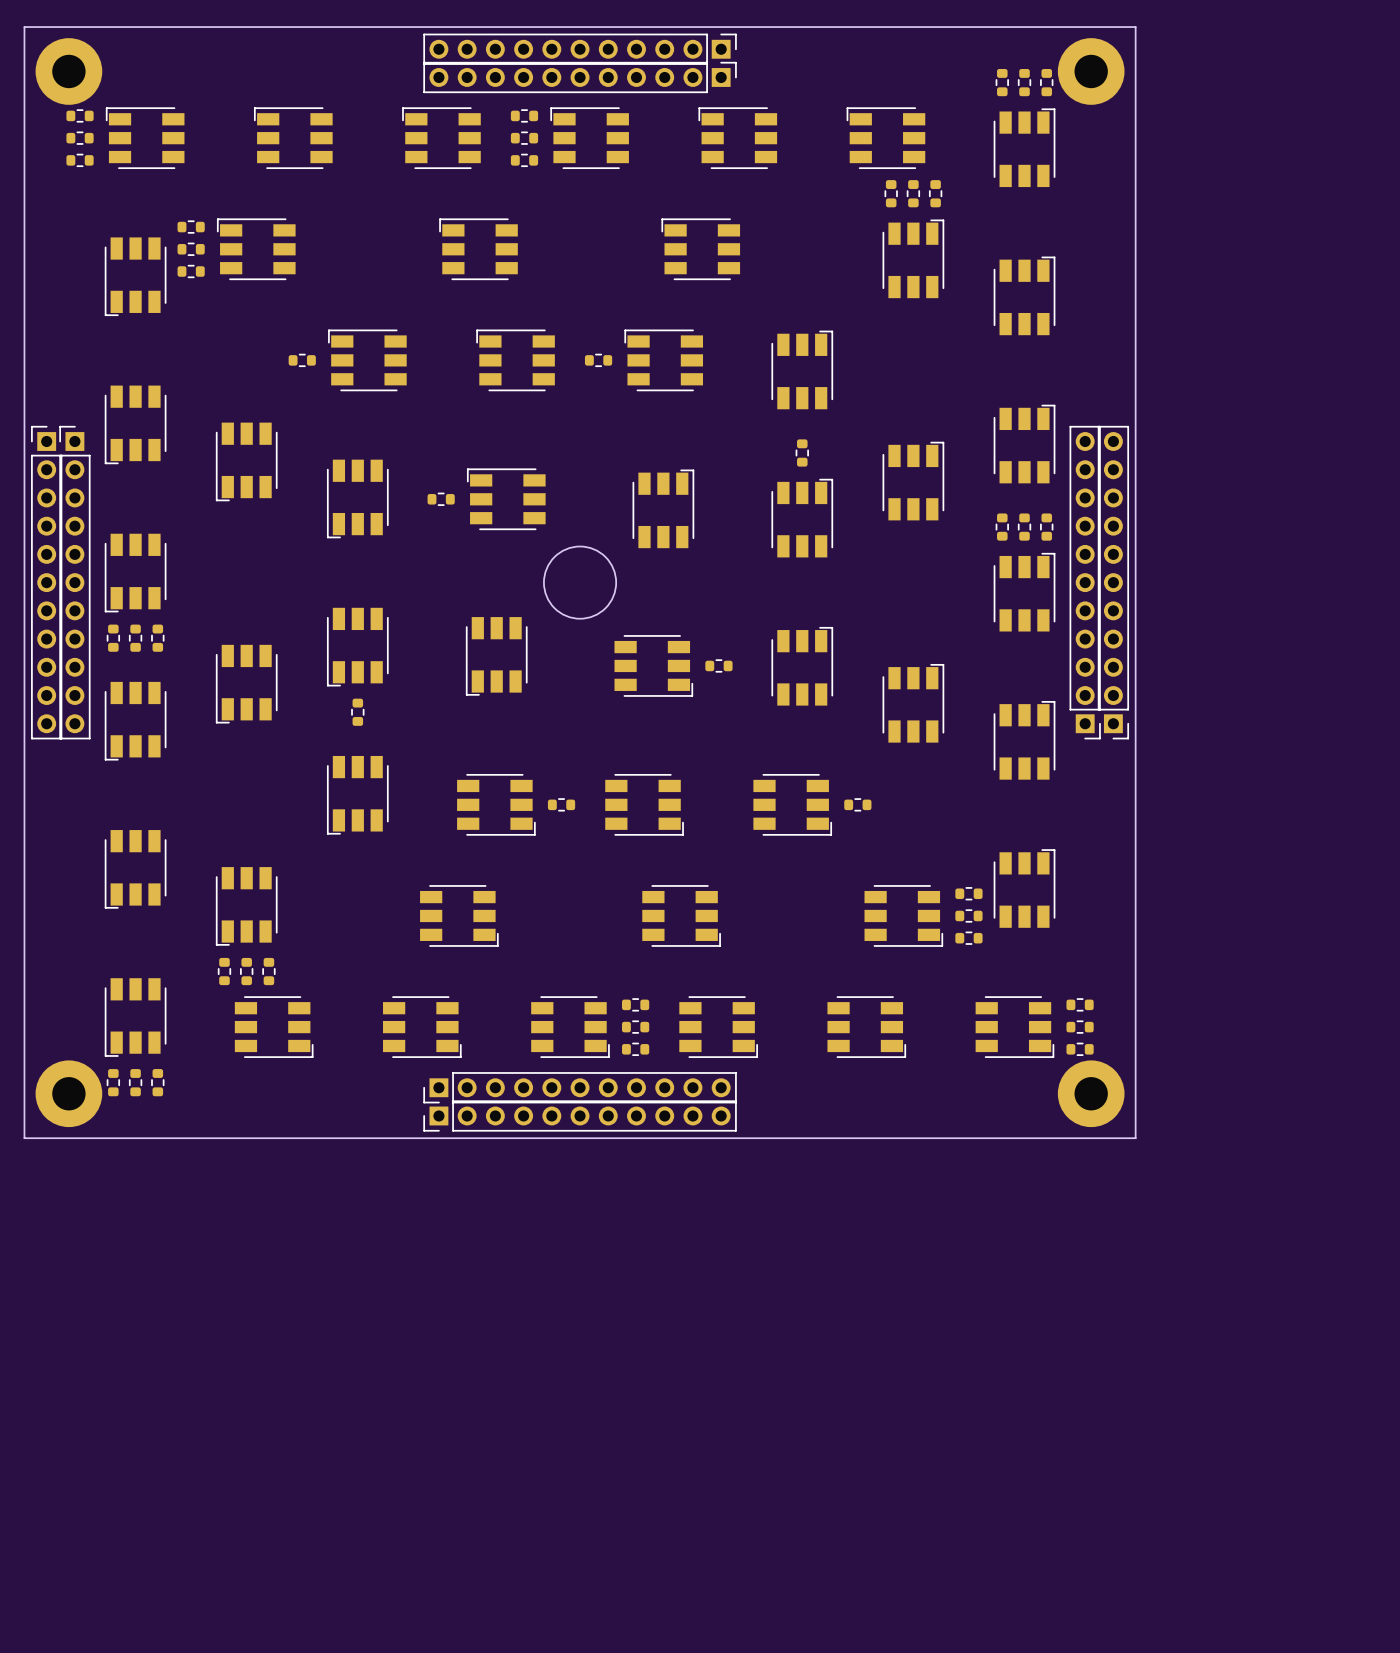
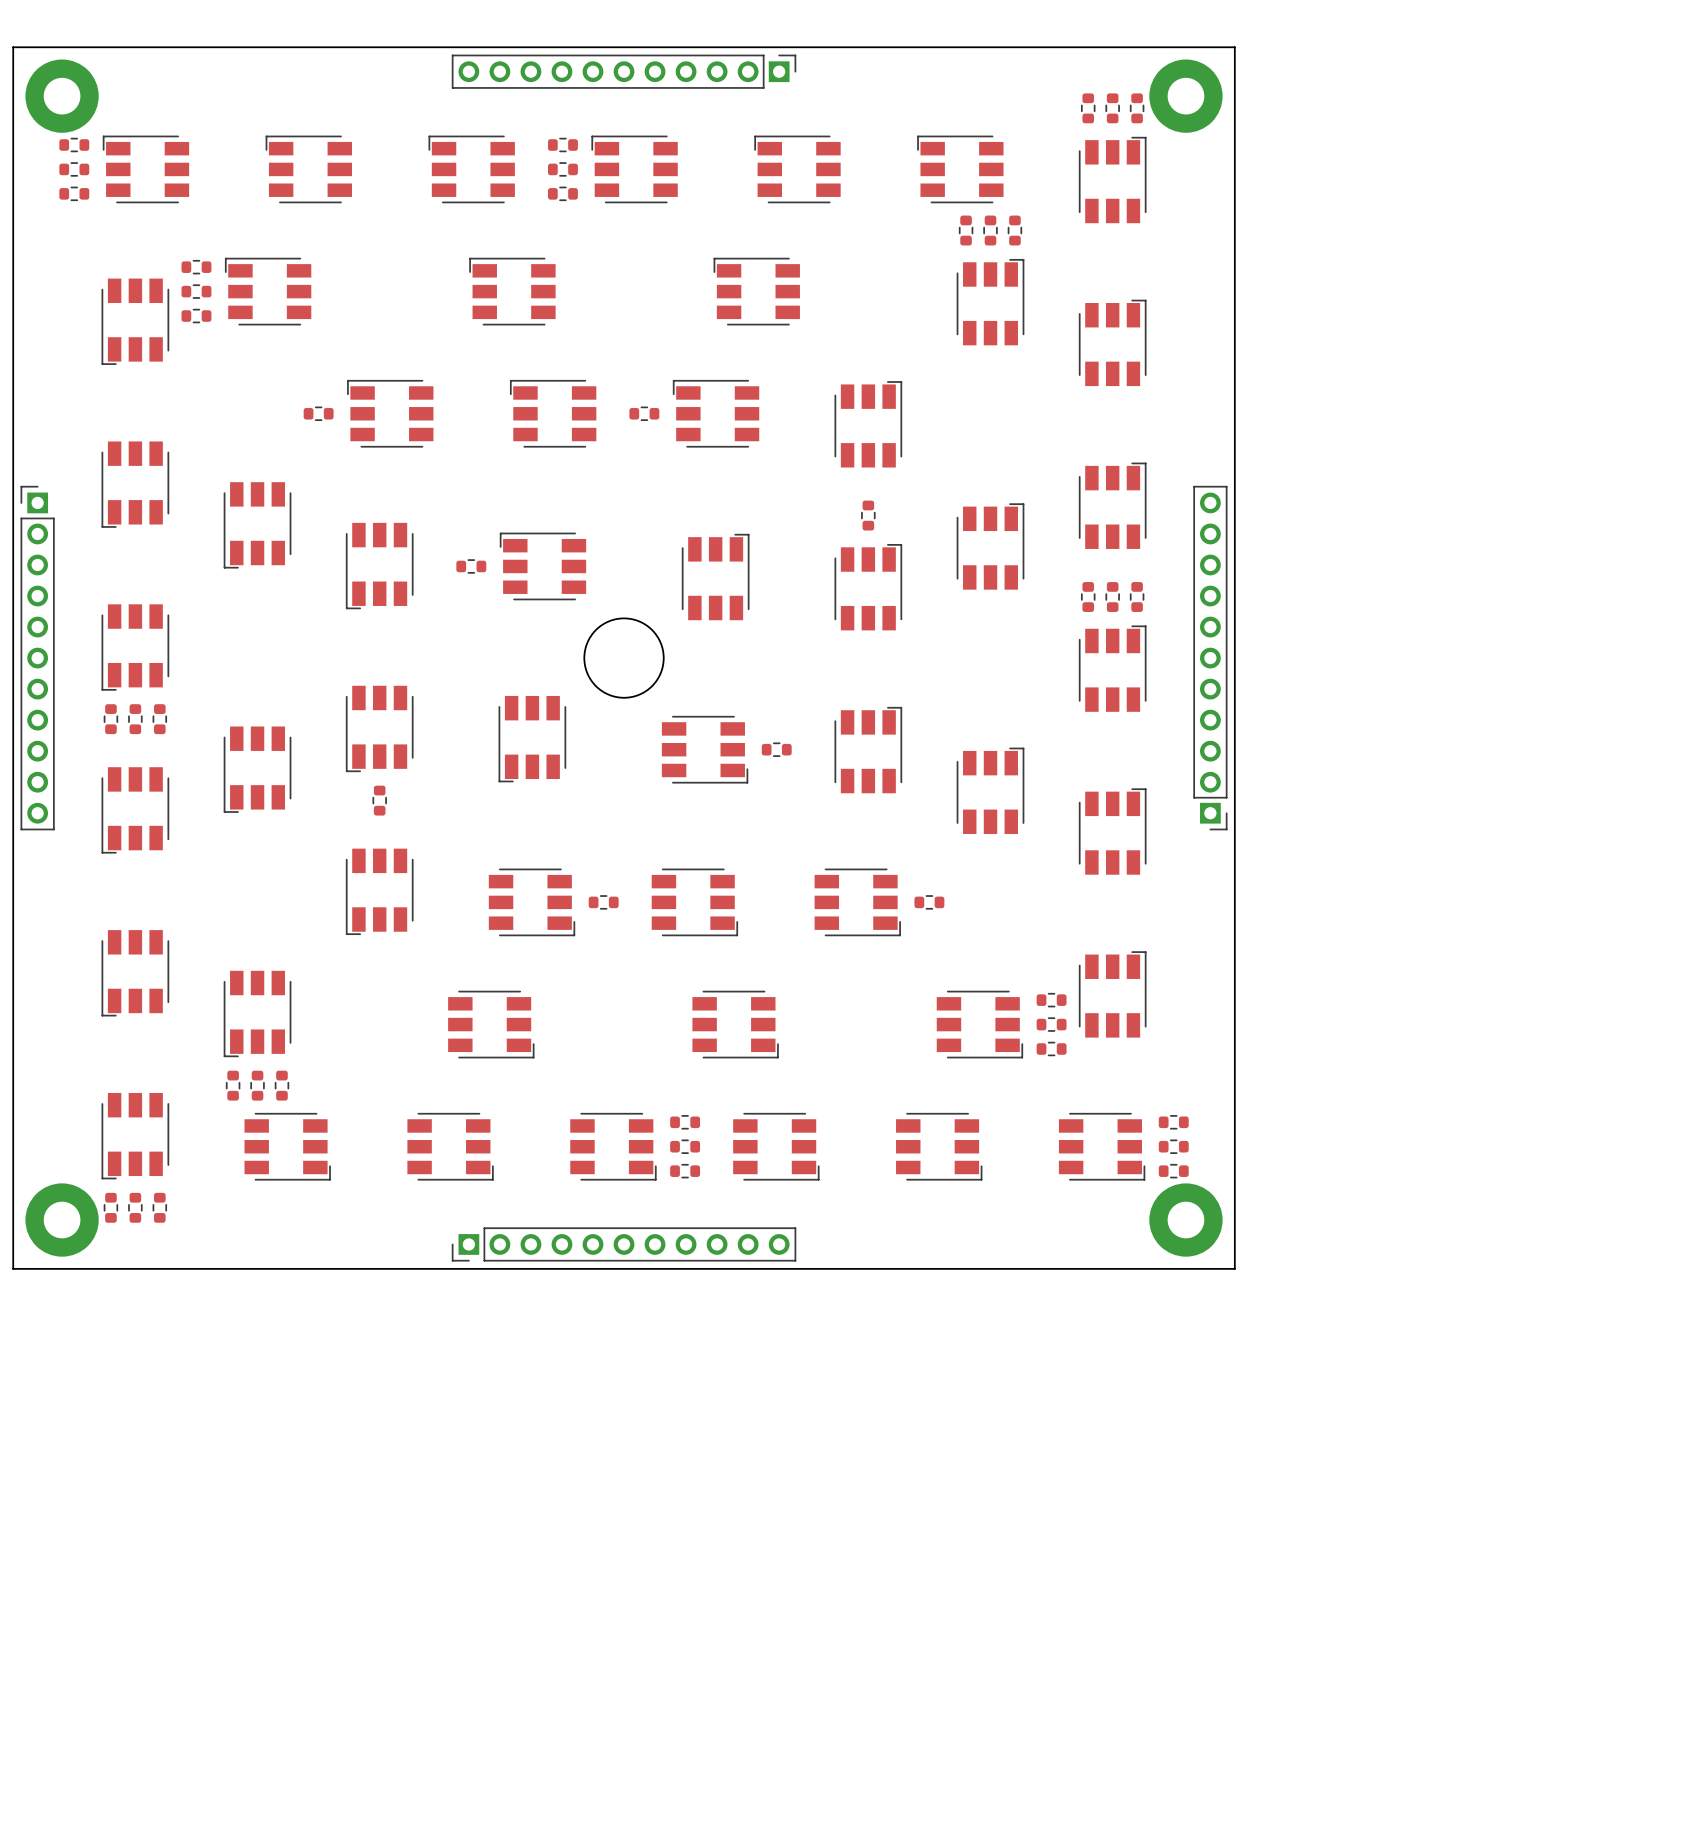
part: (580, 77) -> none
part: (74, 582) -> none
part: (1085, 582) -> none
part: (580, 1087) -> none

